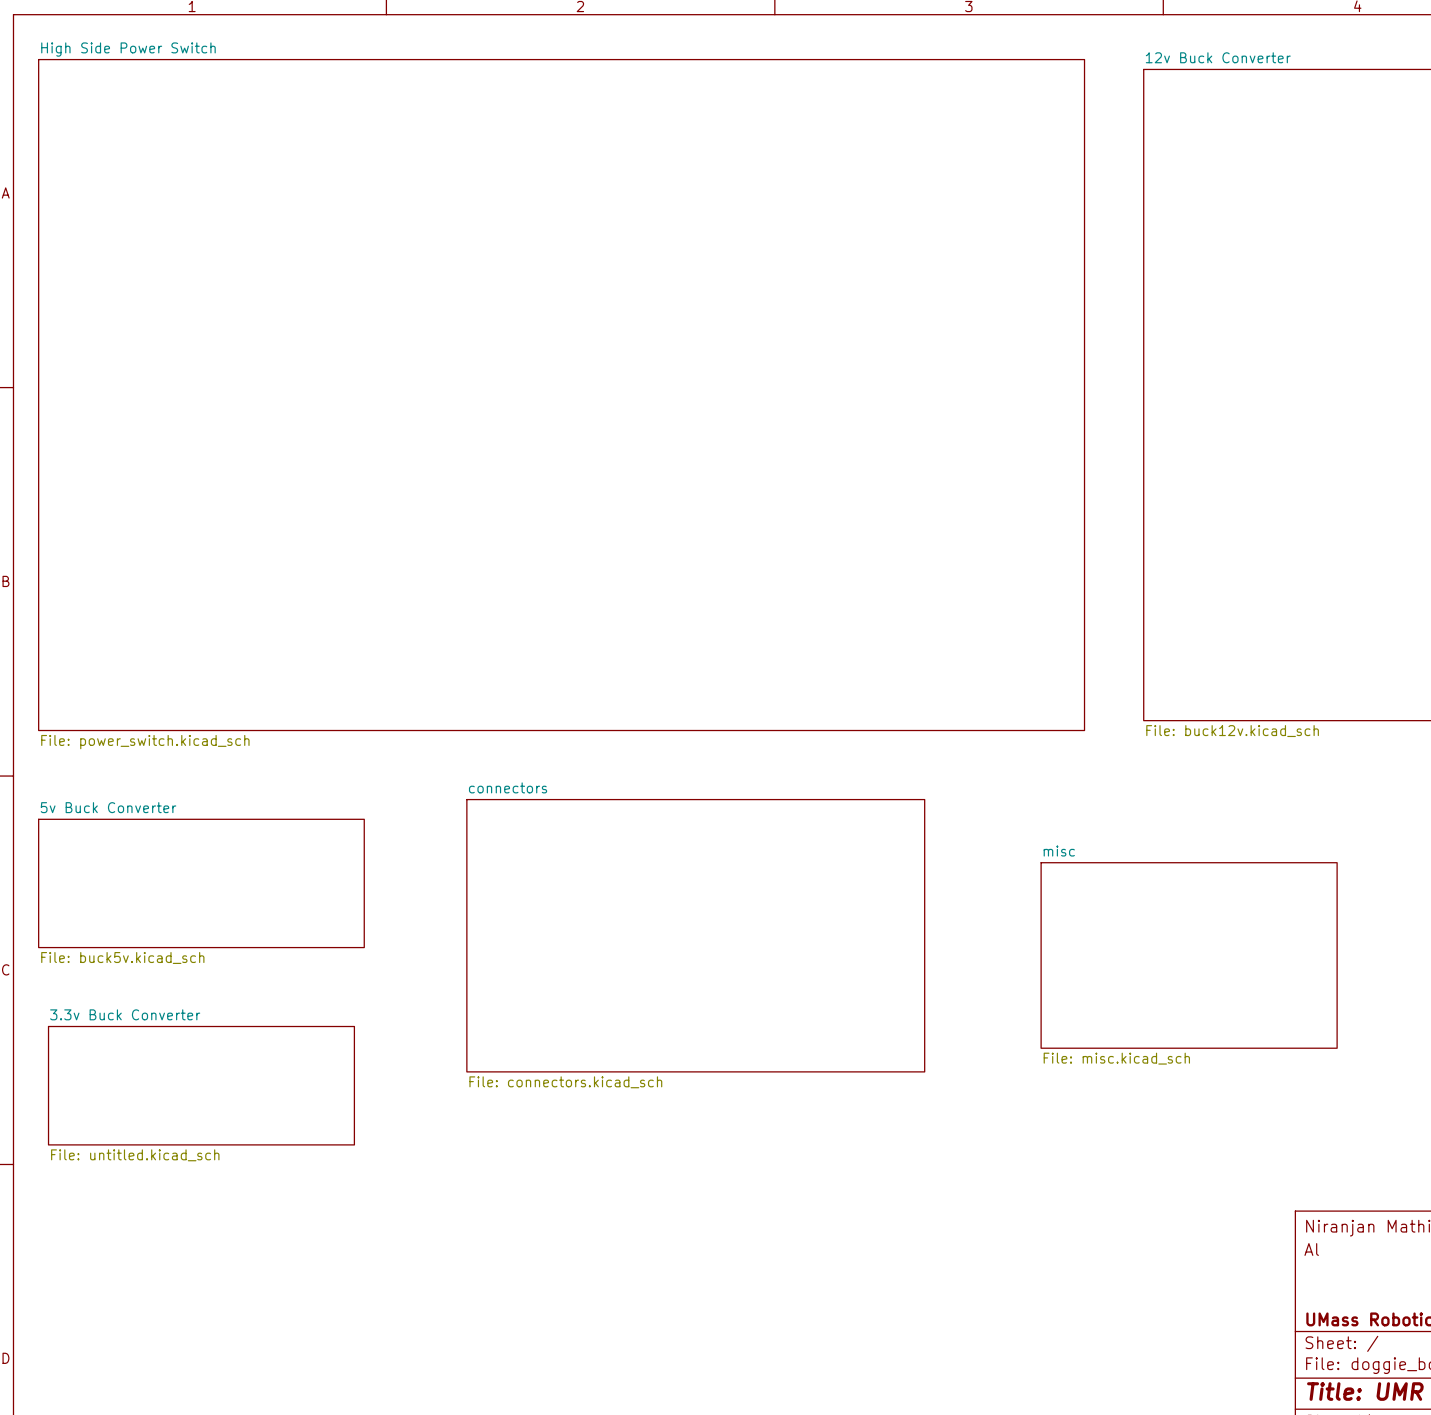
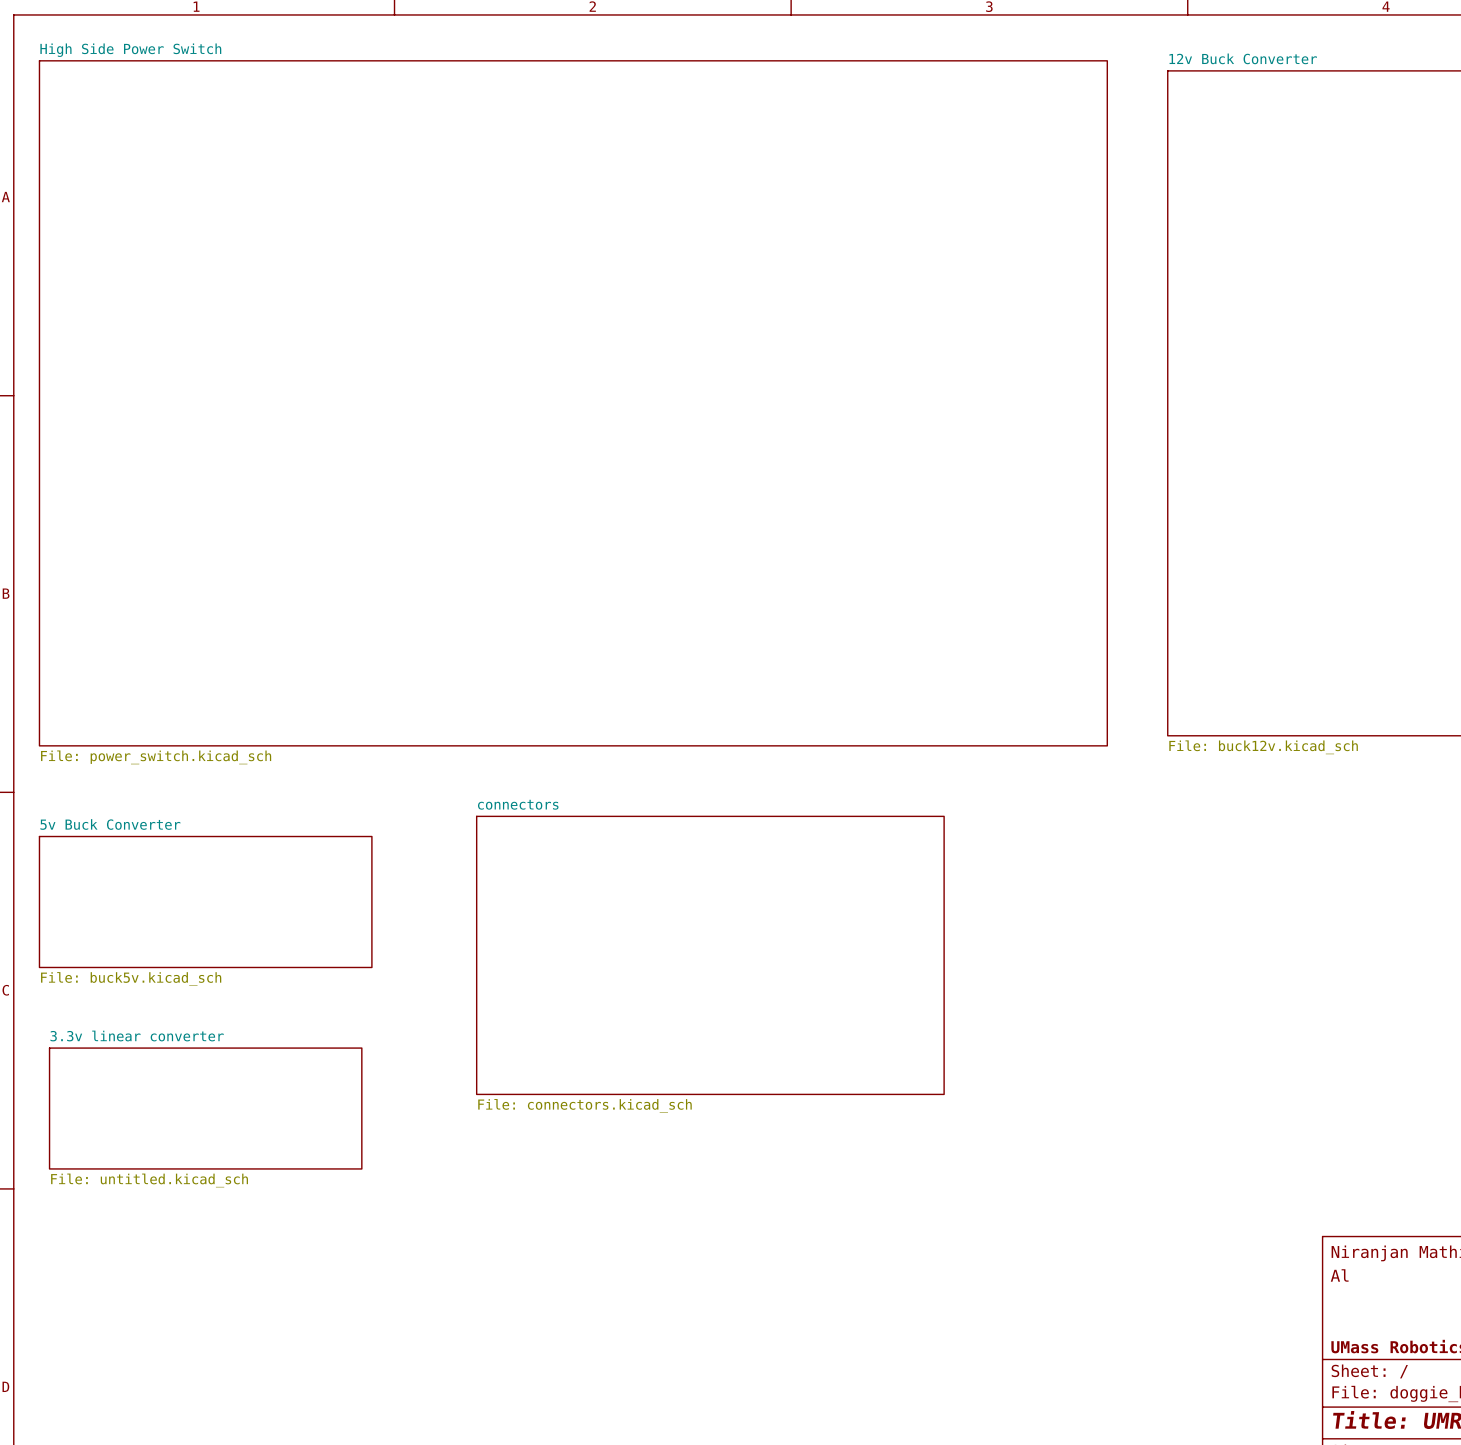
sheet misc: File: misc.kicad_sch (1189, 955) -> none
sheet 3.3v Buck Converter name: 3.3v Buck Converter (125, 1014) -> 3.3v linear converter (137, 1036)

